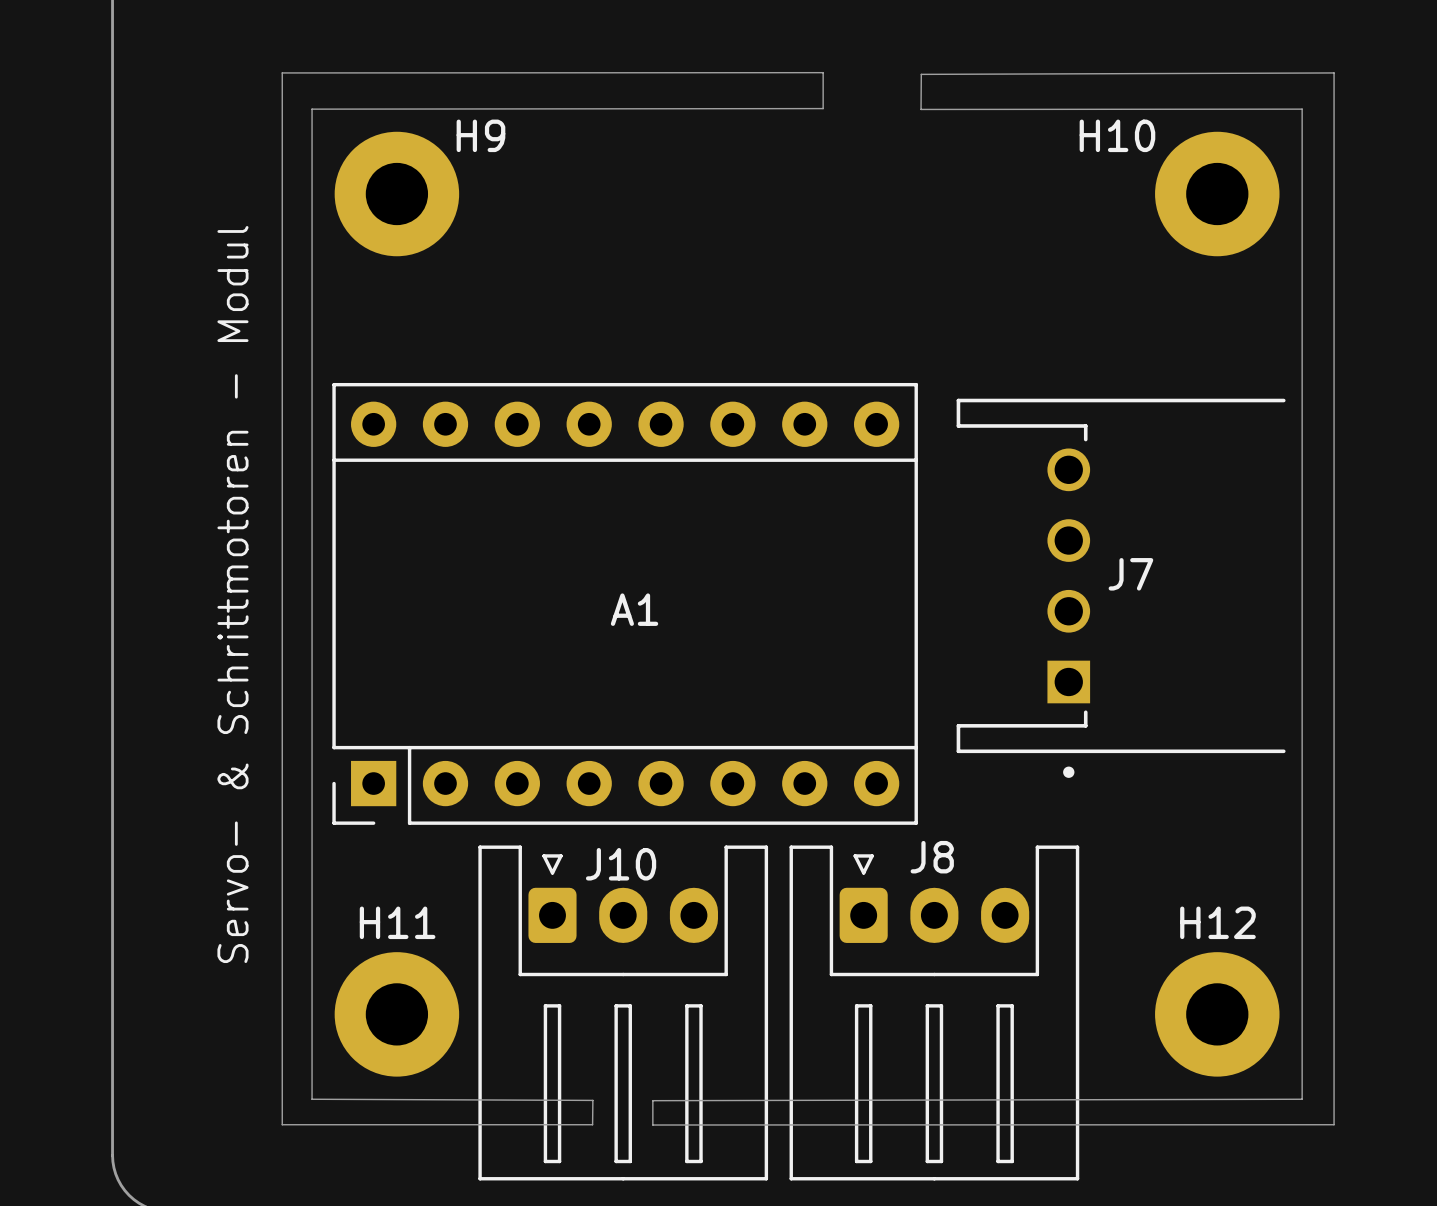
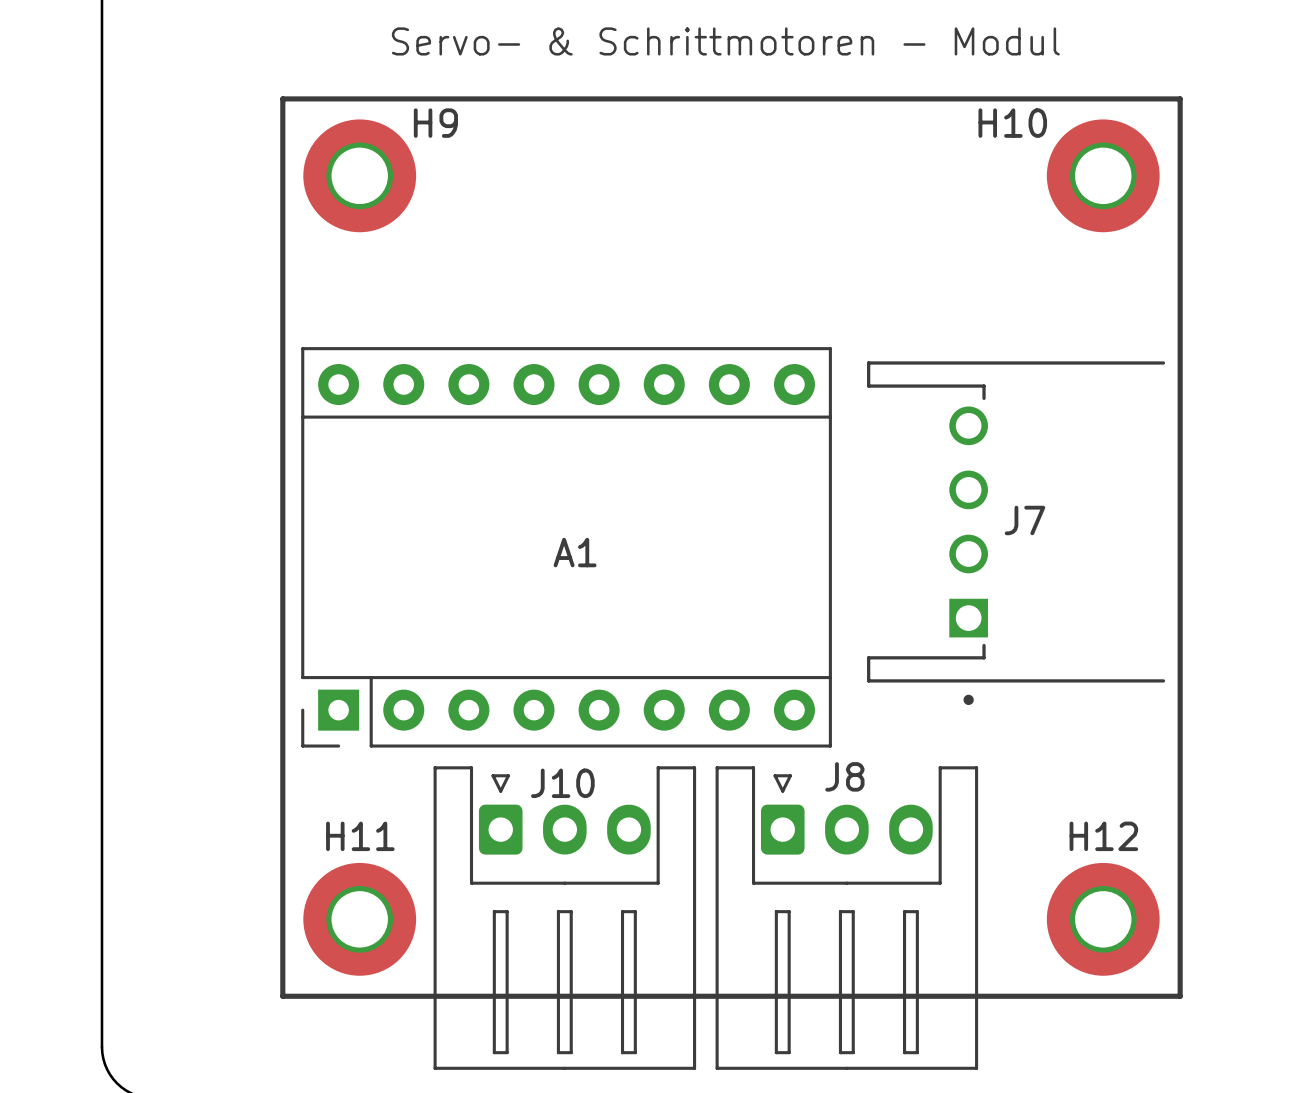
text: none -> Servo- & Schrittmotoren - Modul (725, 41)
board edge: (823, 72) (823, 108) (312, 109) (312, 1099) (592, 1100) (592, 1124) (282, 1124) (282, 72) (823, 72) -> none
board edge: (1334, 72) (921, 74) (921, 109) (1302, 109) (1302, 1099) (652, 1100) (652, 1125) (1334, 1124) (1334, 72) -> none
line: none -> (282, 98) (1180, 98) (1180, 996) (282, 996) (282, 98)
text: Servo- & Schrittmotoren - Modul (232, 594) -> none

